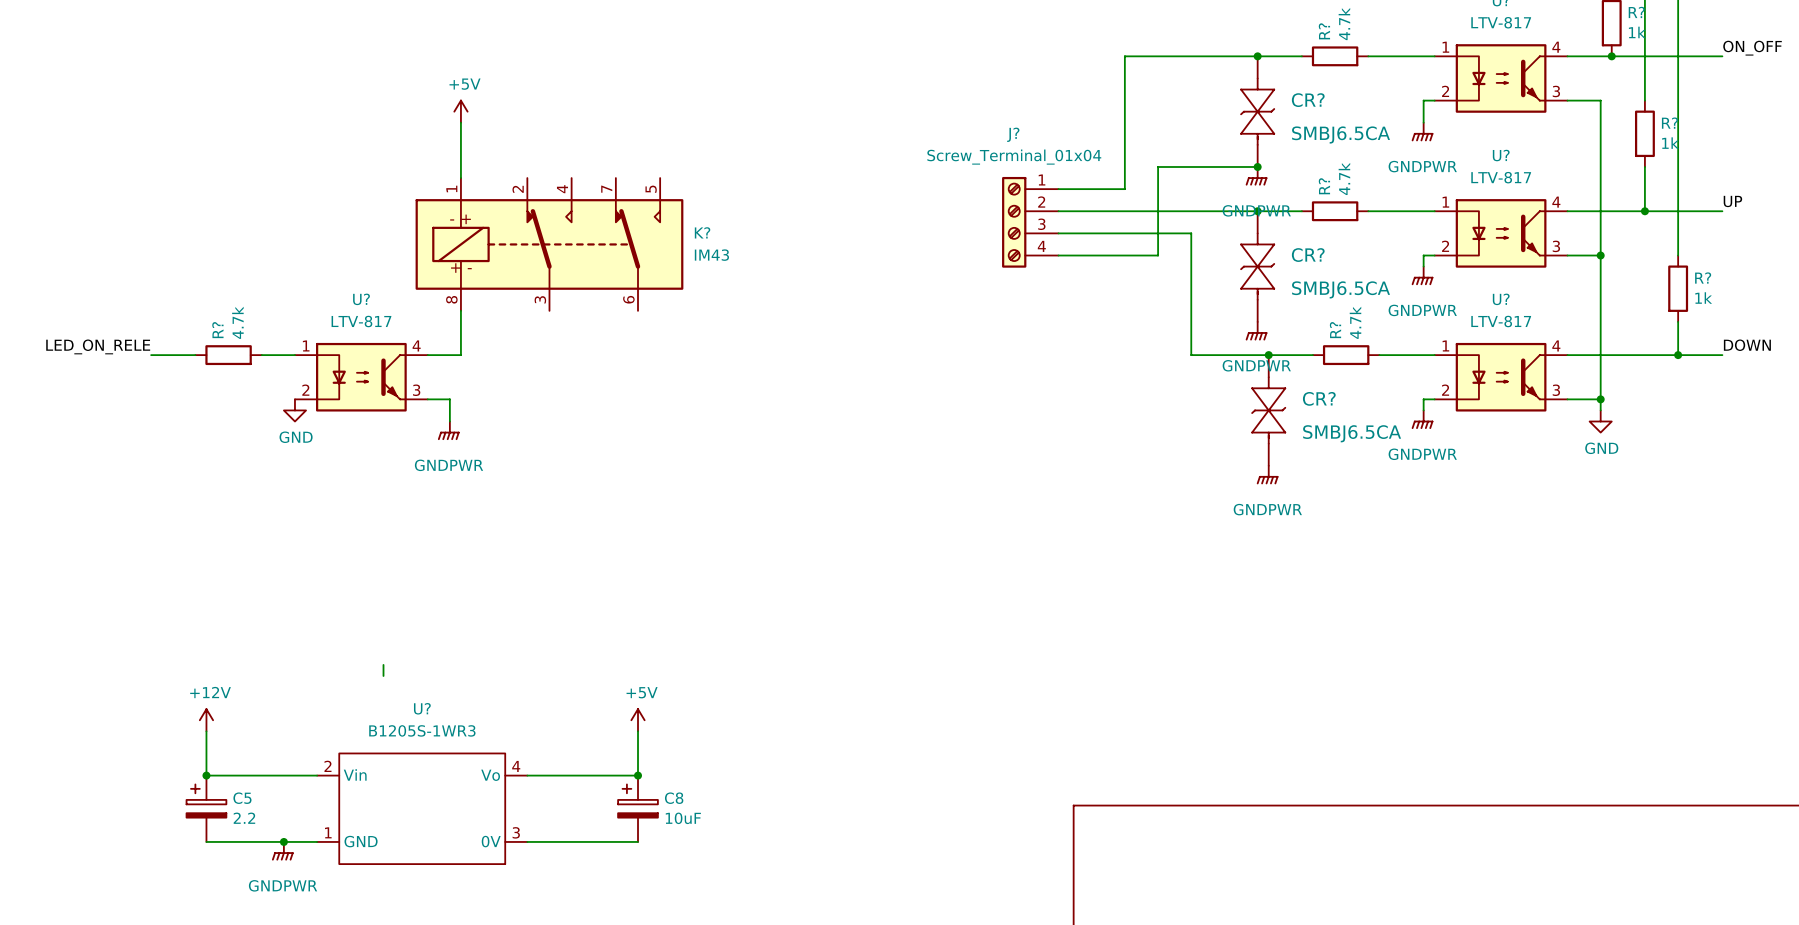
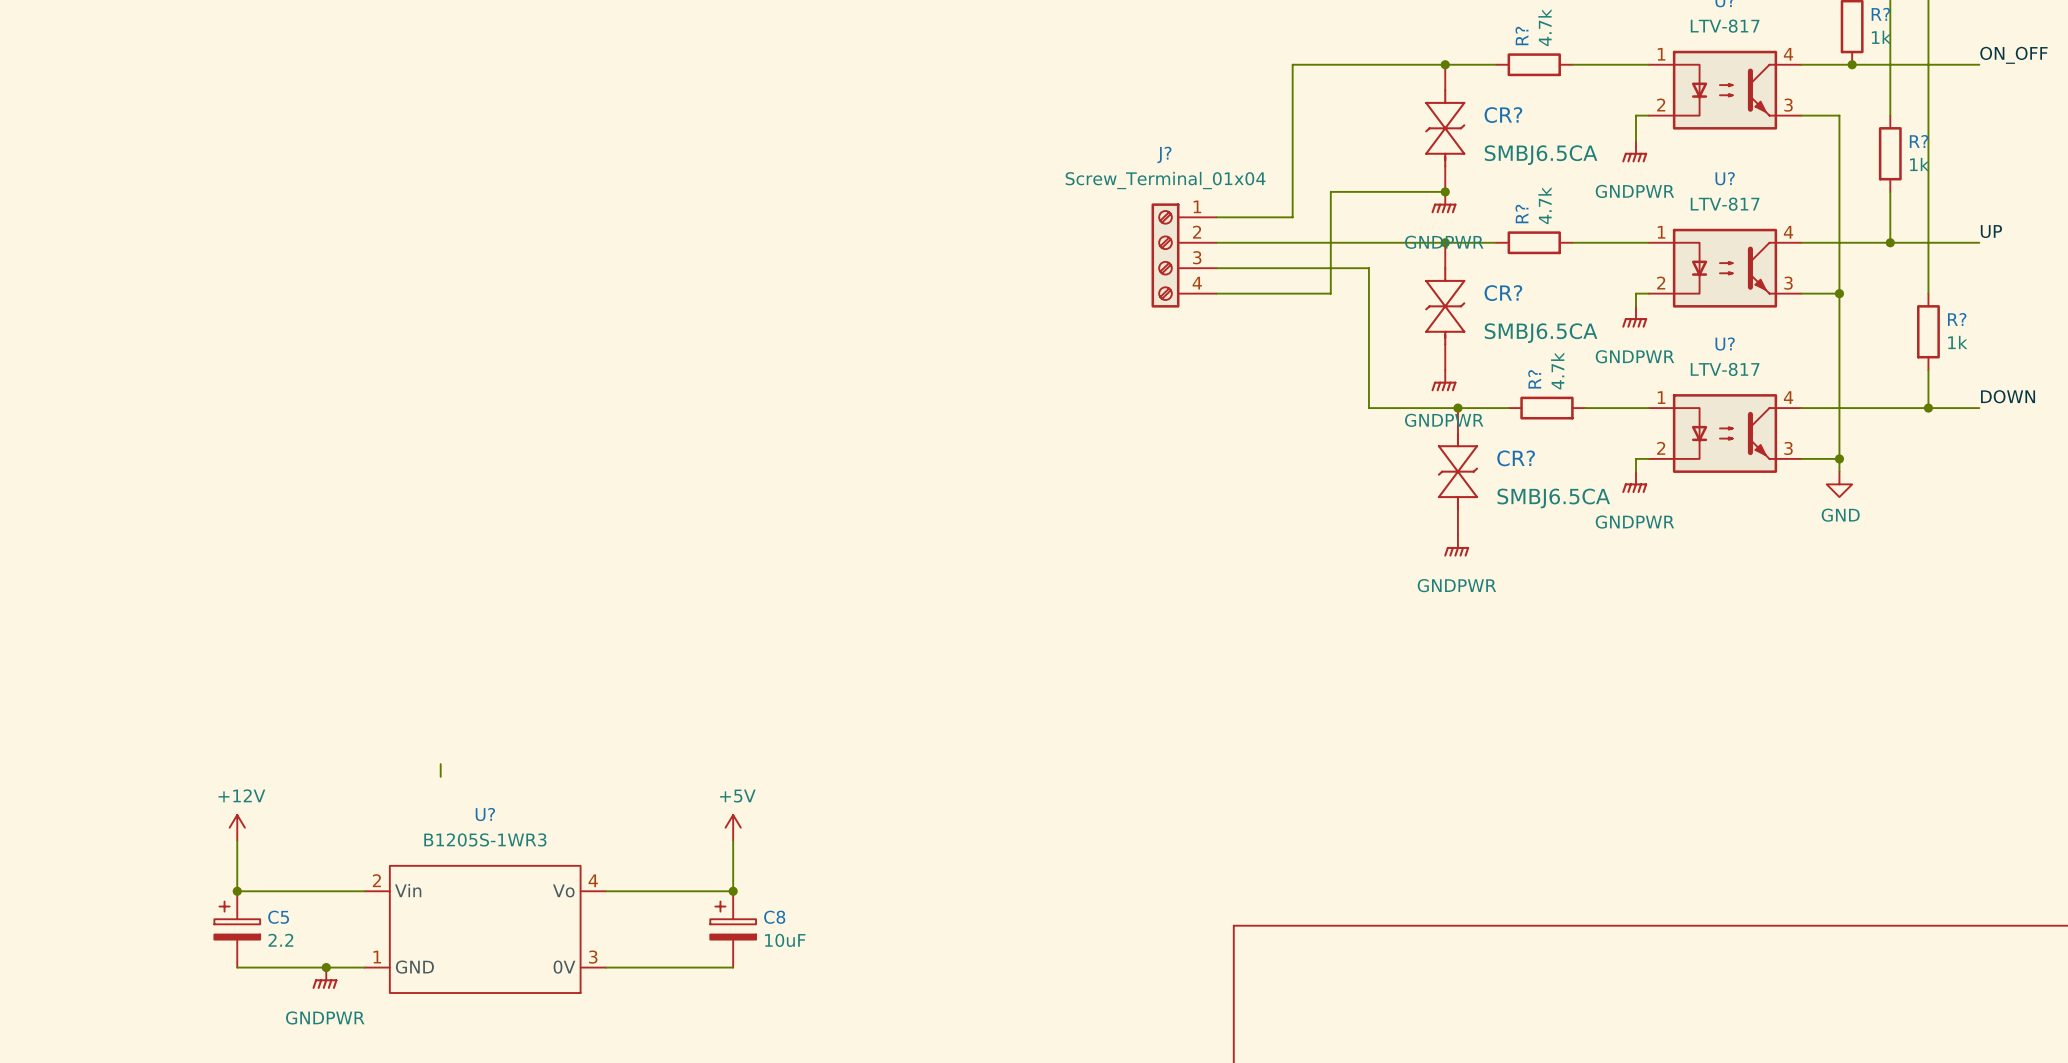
power symbol: +5V (460, 111) -> none
wire: (460, 122) (460, 178) -> none
K?: IM43 (549, 244) -> none
wire: (460, 310) (460, 355) (427, 355) -> none
label: LED_ON_RELE (98, 346) -> none
wire: (151, 355) (195, 355) -> none
R?: 4.7k (228, 355) -> none
wire: (261, 355) (294, 355) -> none
U?: LTV-817 (361, 377) -> none
wire: (427, 399) (449, 399) (449, 421) -> none
power symbol: GND (294, 410) -> none
power symbol: GNDPWR (448, 430) -> none

